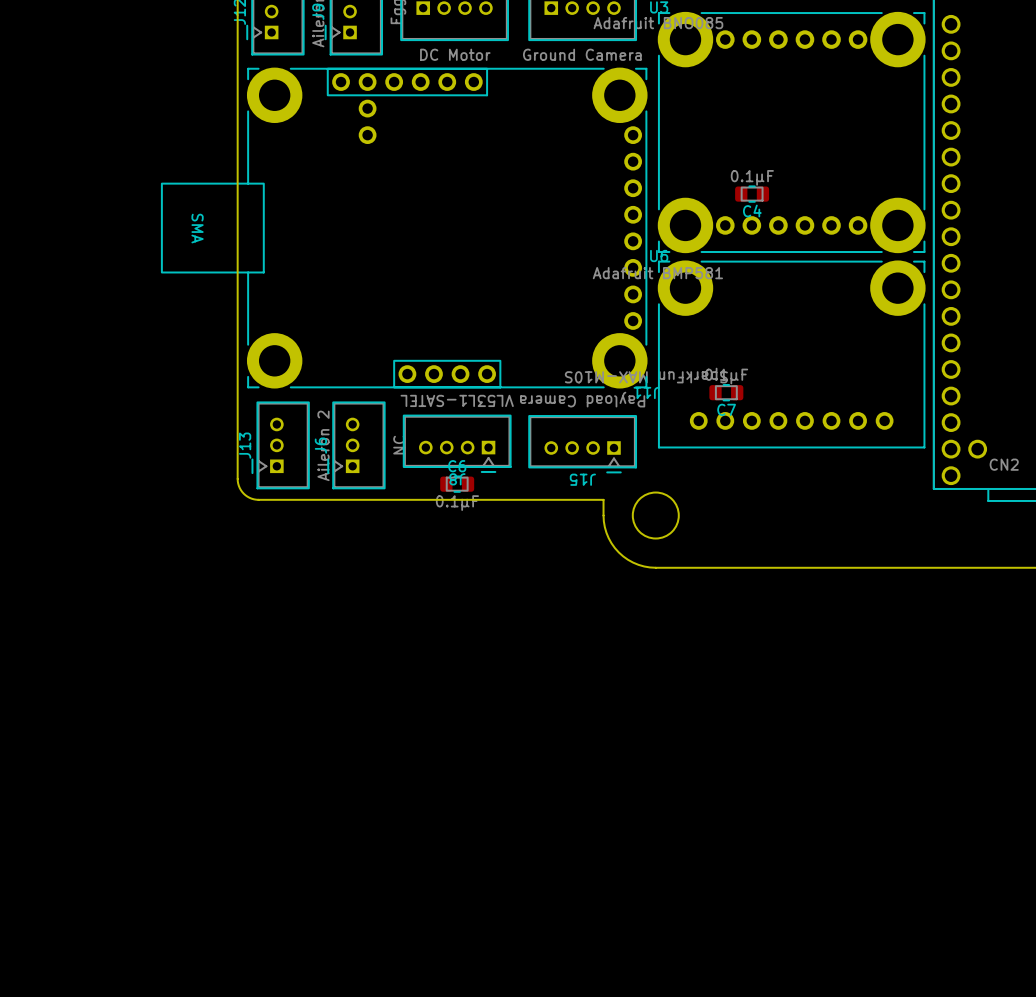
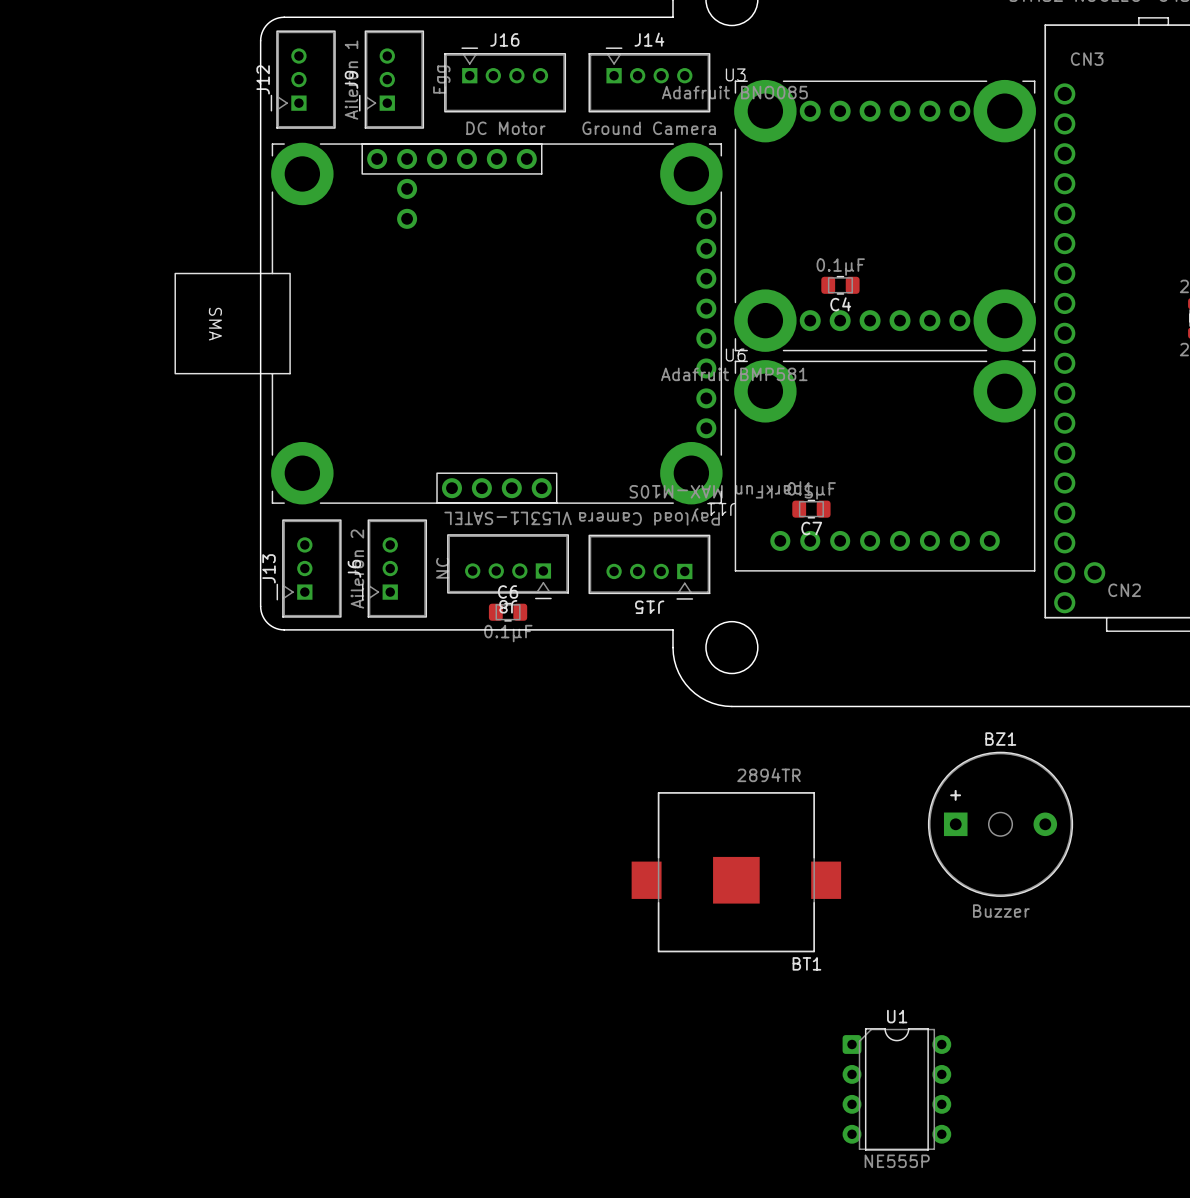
BZ1: none -> Buzzer (1000, 824)
BT1: none -> 2894TR (736, 872)
U1: none -> NE555P (896, 1089)

